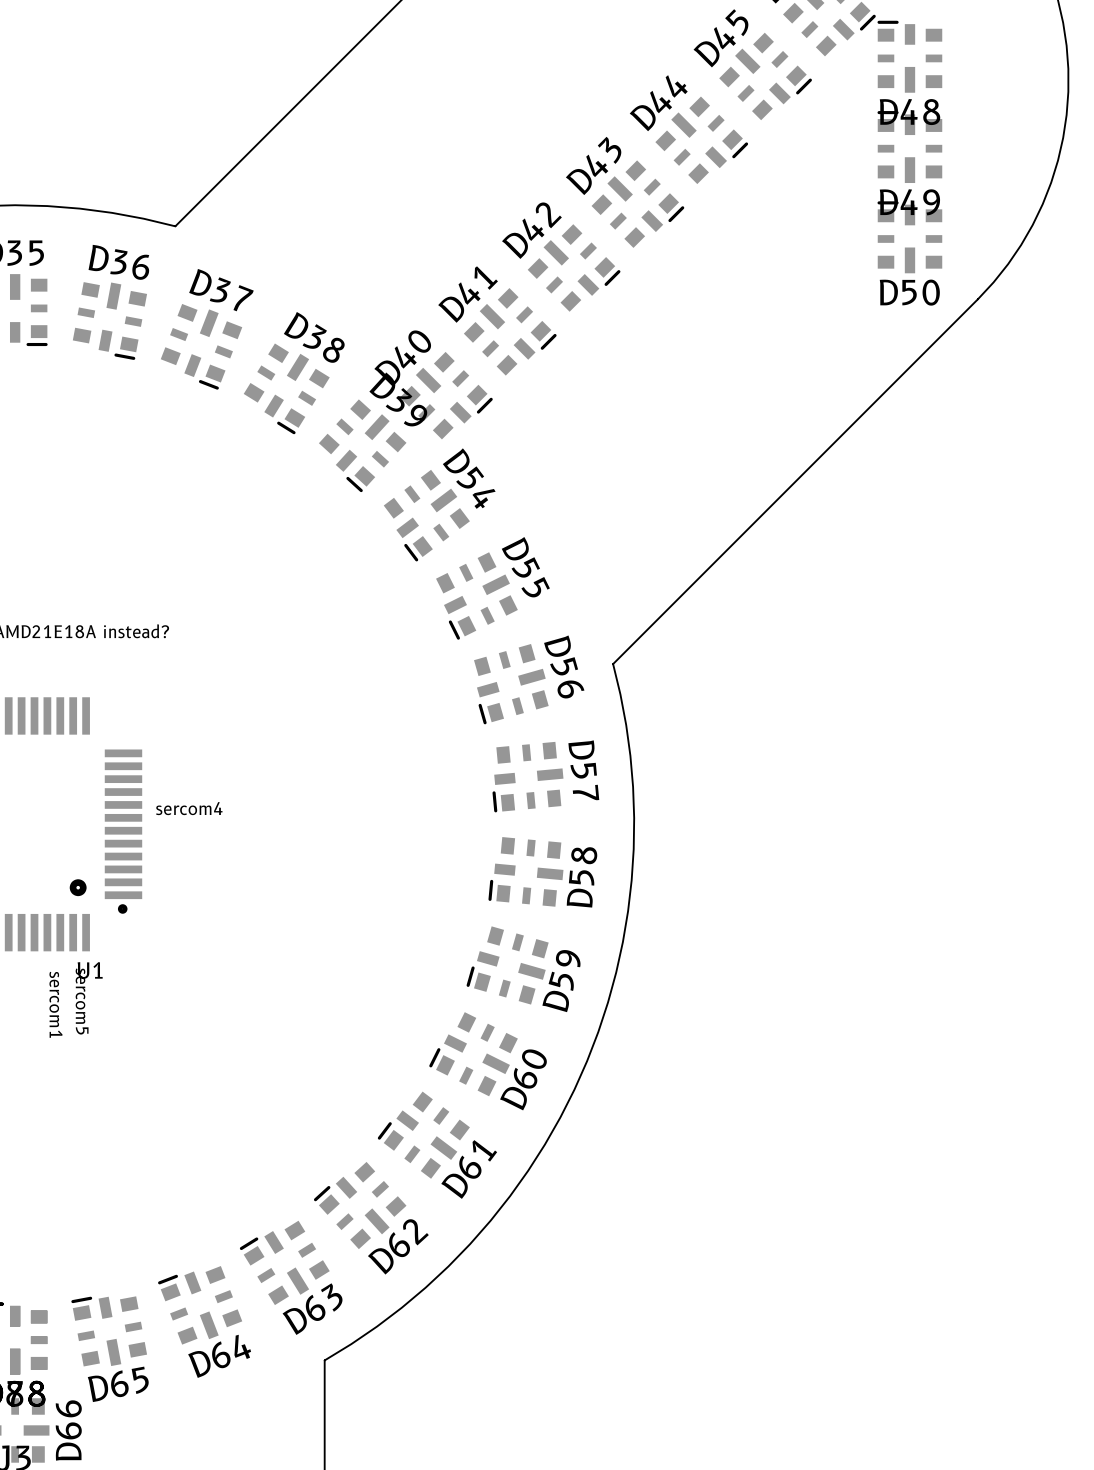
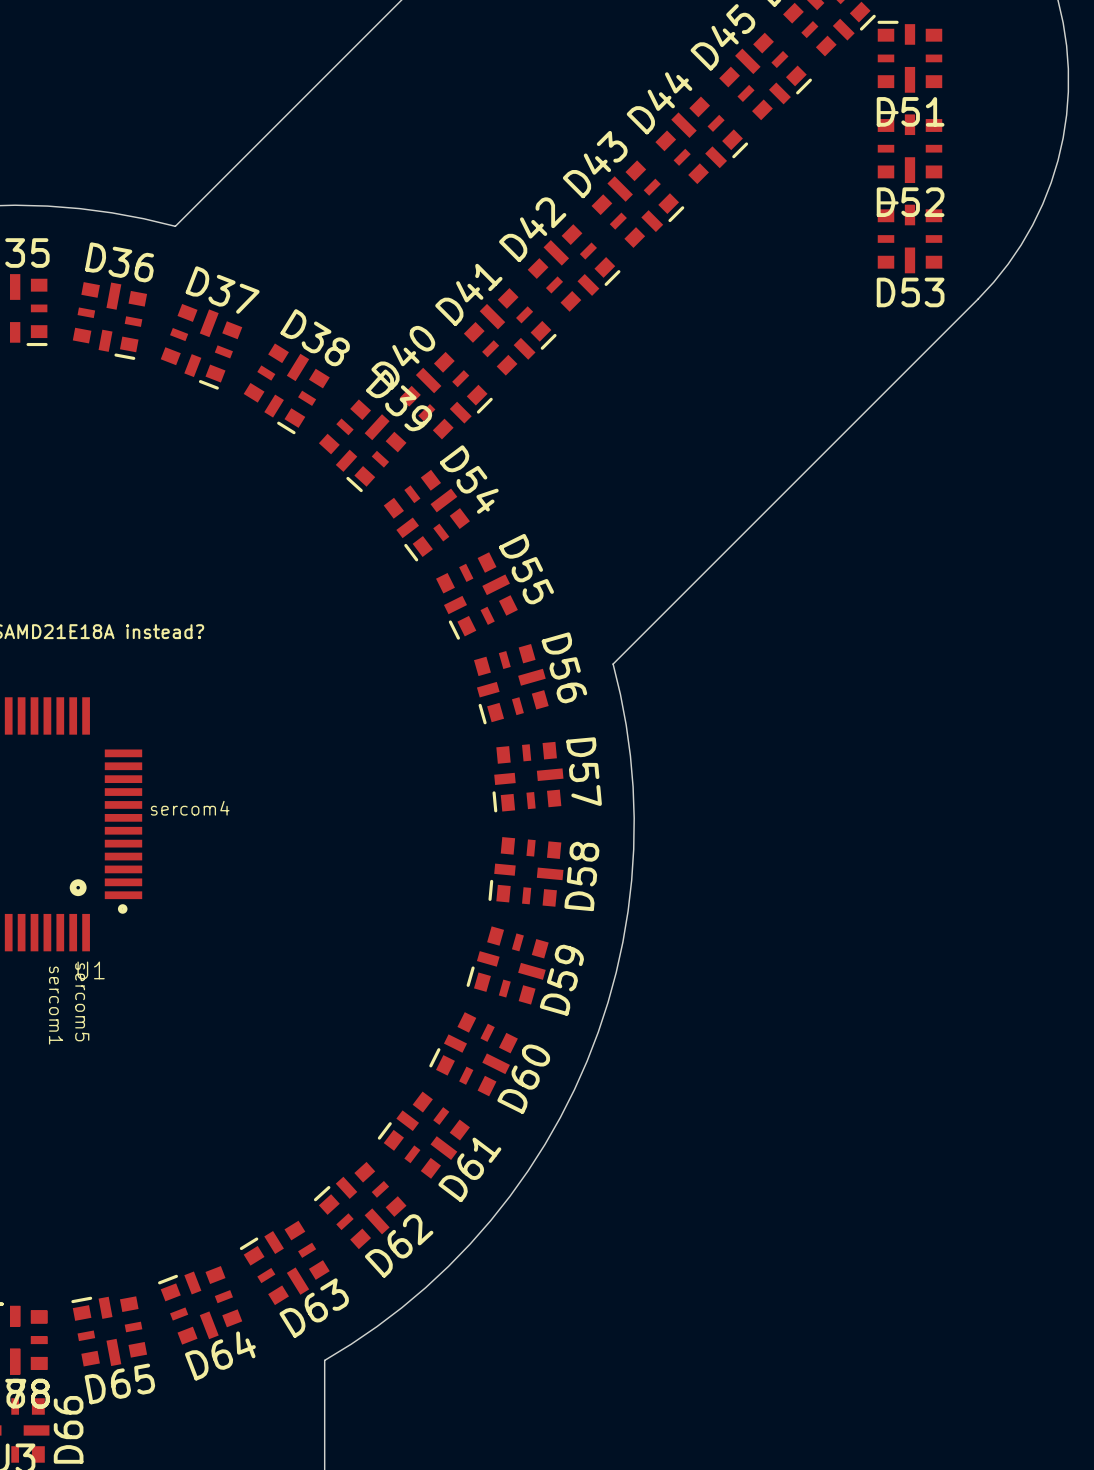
D48 name: D48 (910, 112) -> D51 (910, 111)
D49 name: D49 (909, 202) -> D52 (910, 202)
D50 name: D50 (909, 292) -> D53 (910, 292)

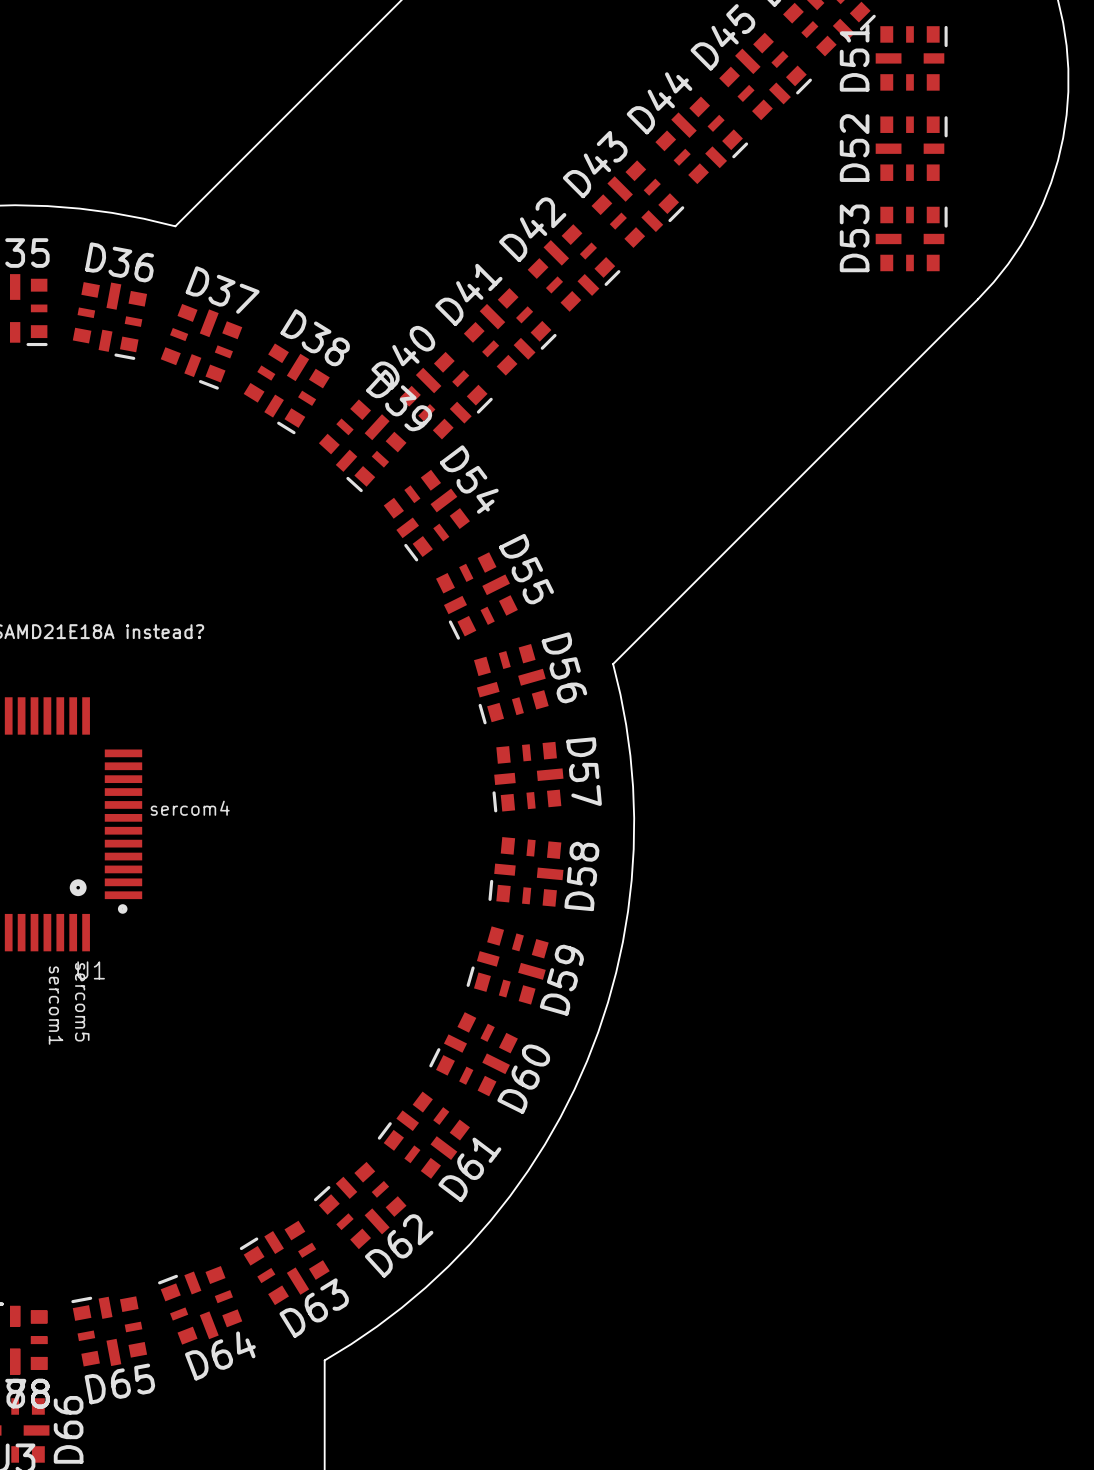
D51 rotation: 0° (909, 56) -> 90° clockwise (911, 58)
D52 rotation: 0° (909, 147) -> 90° clockwise (911, 148)
D53 rotation: 0° (909, 237) -> 90° clockwise (911, 238)

